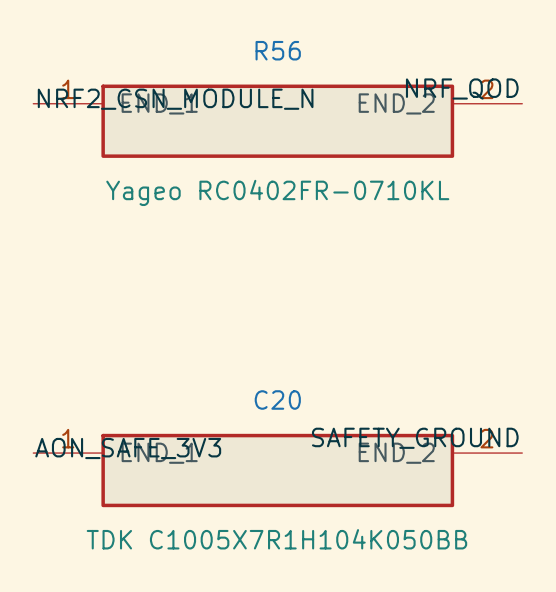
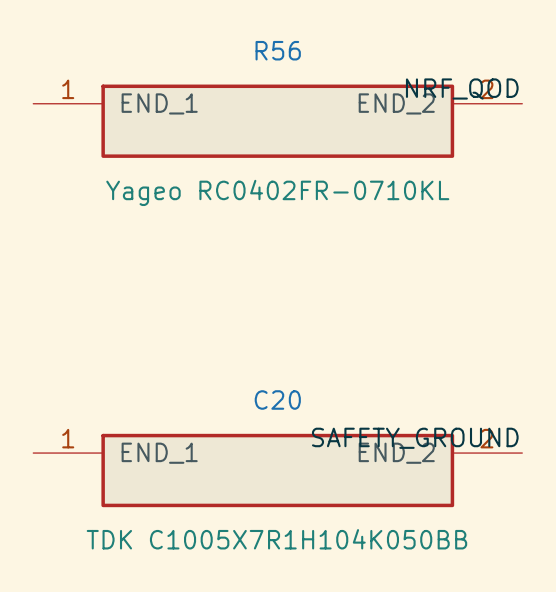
label: NRF2_CSN_MODULE_N (175, 99) -> none
label: AON_SAFE_3V3 (128, 448) -> none

